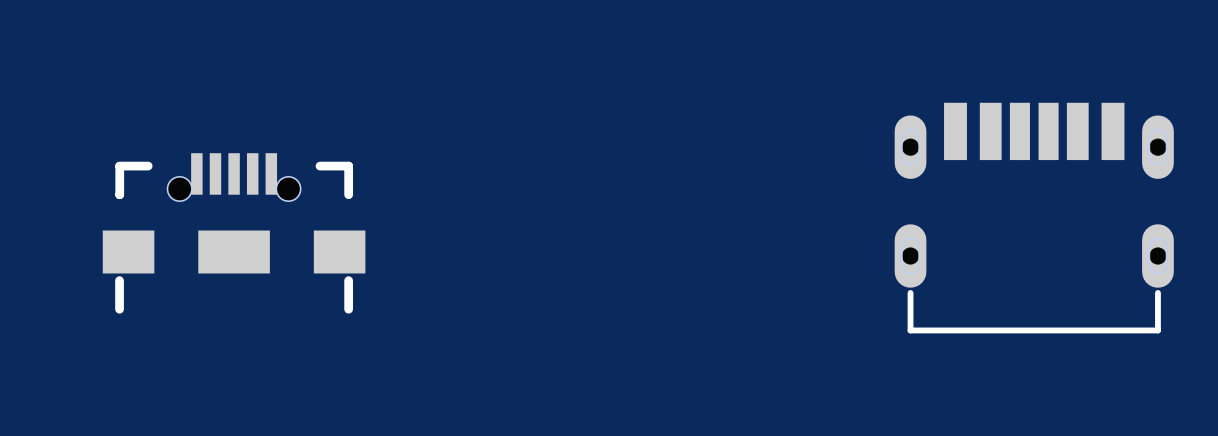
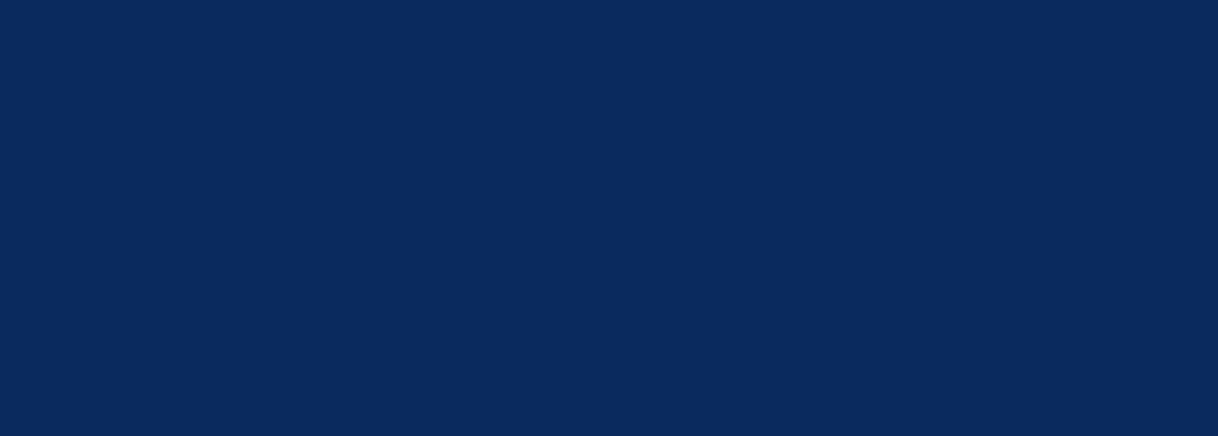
part: (1034, 218) -> none
part: (234, 233) -> none

